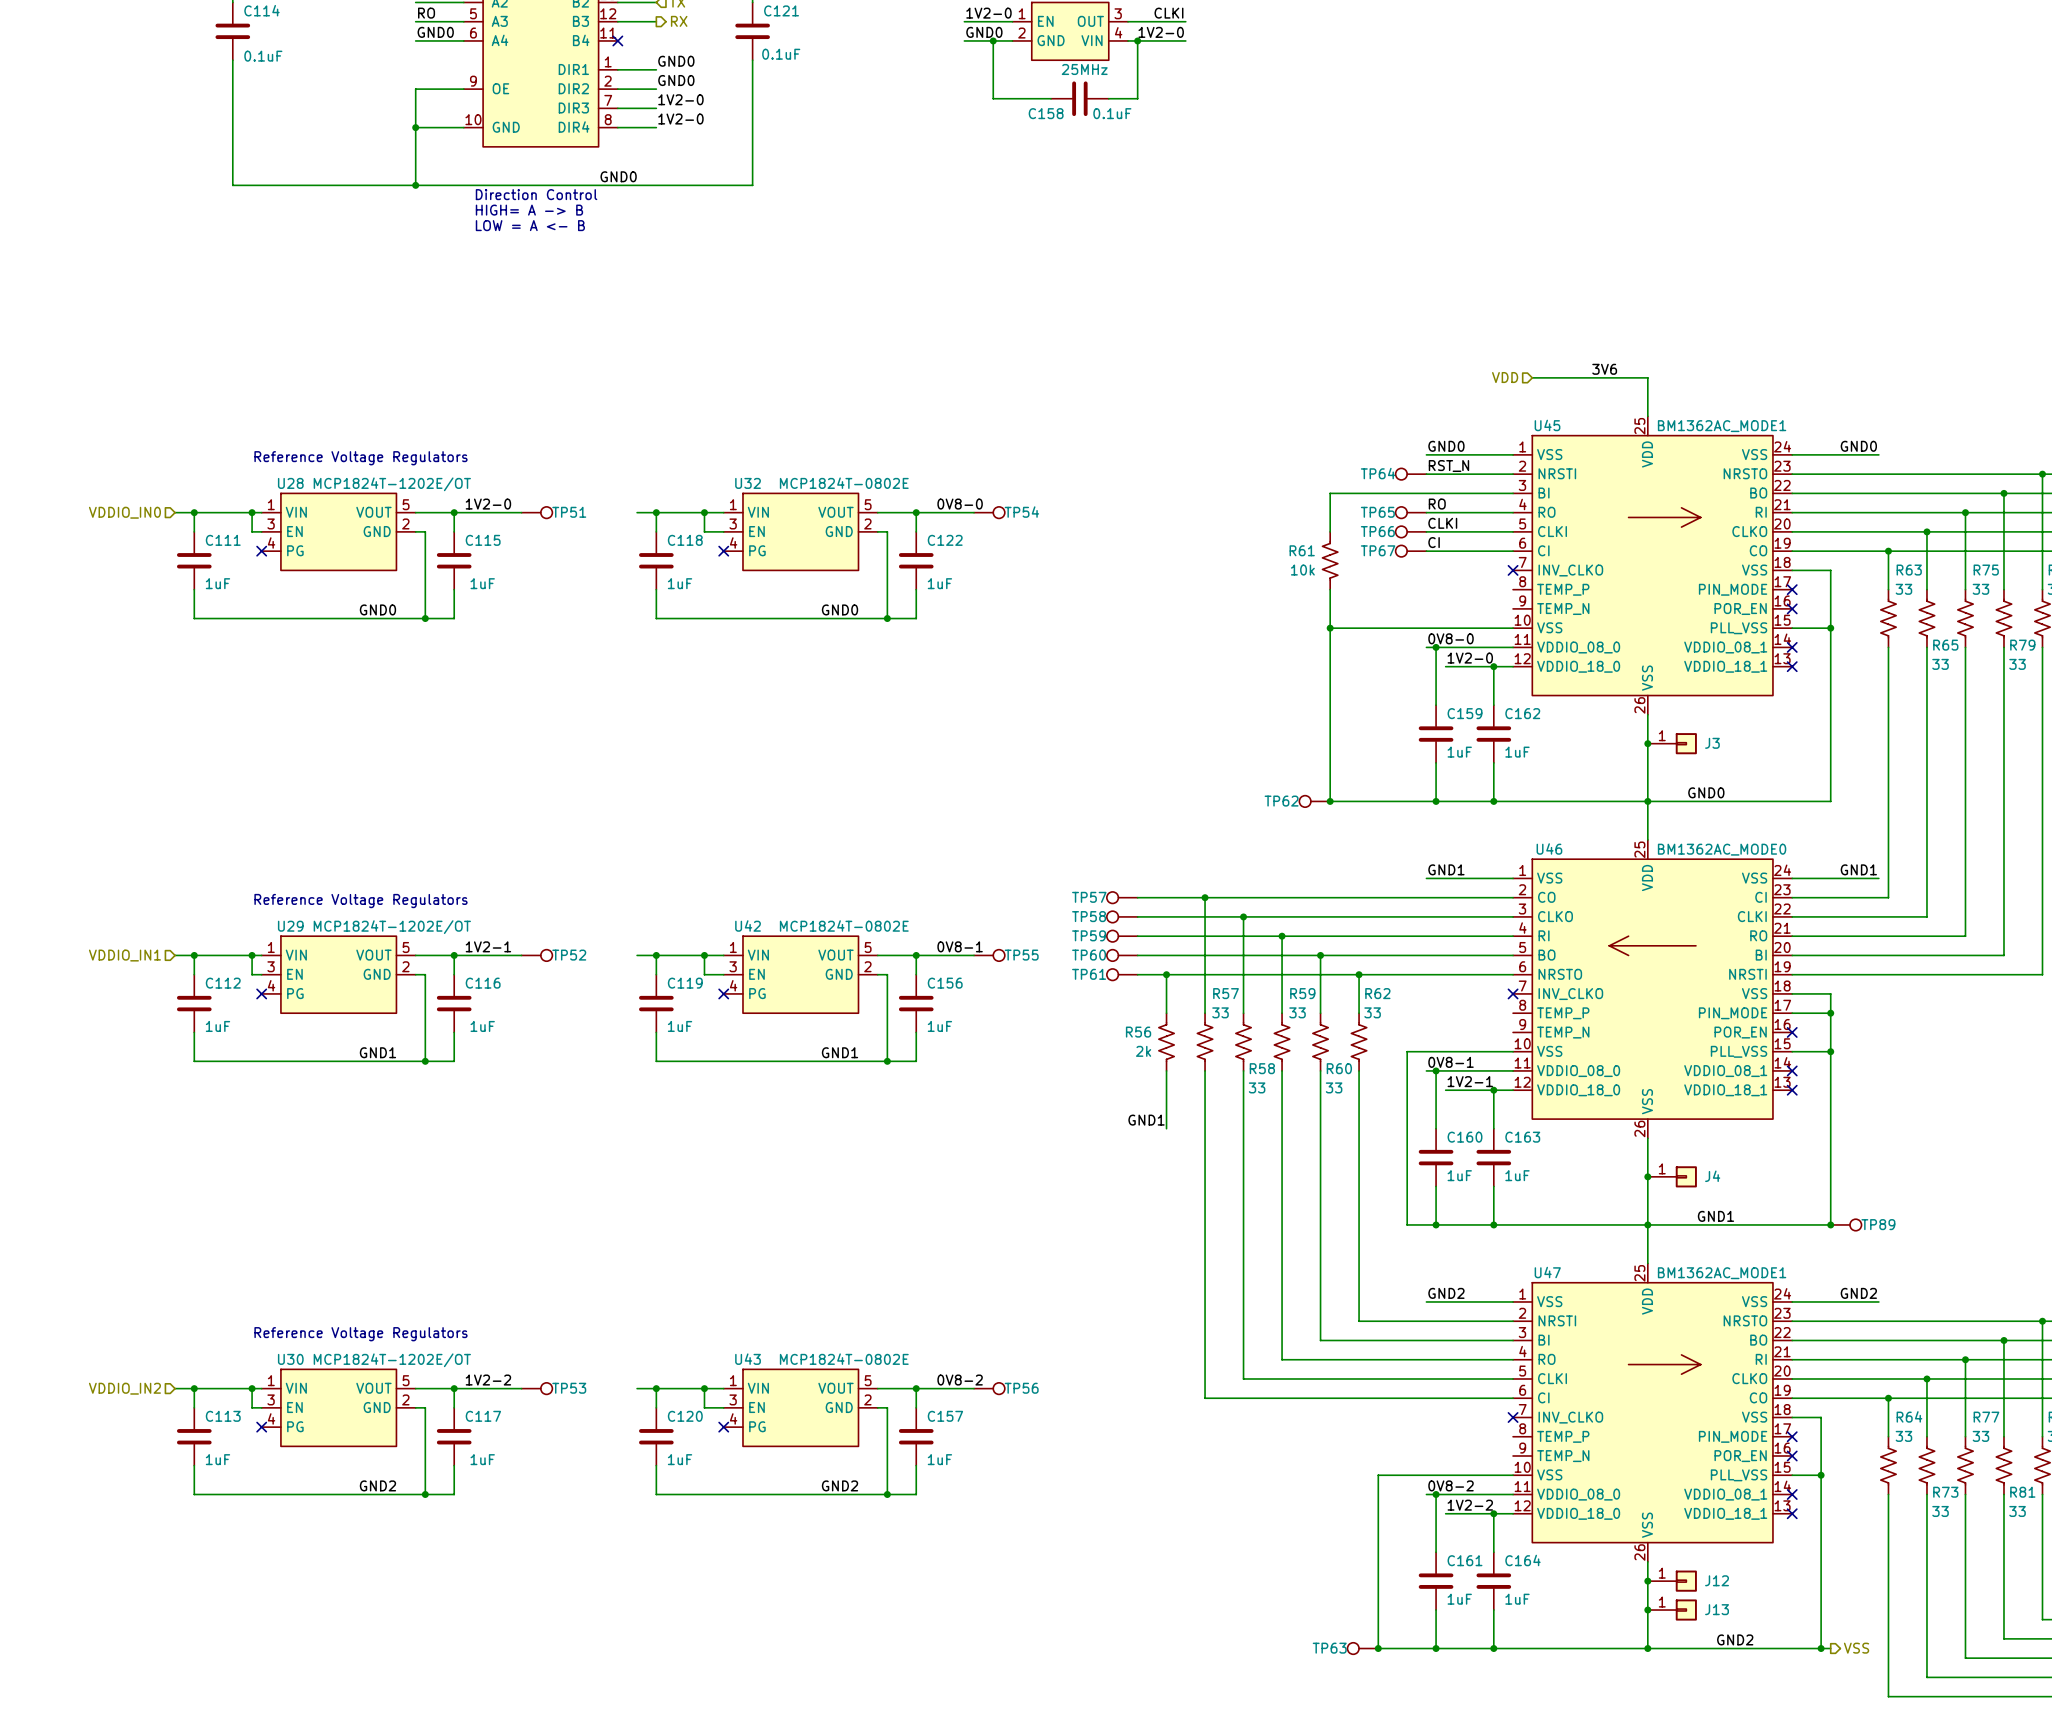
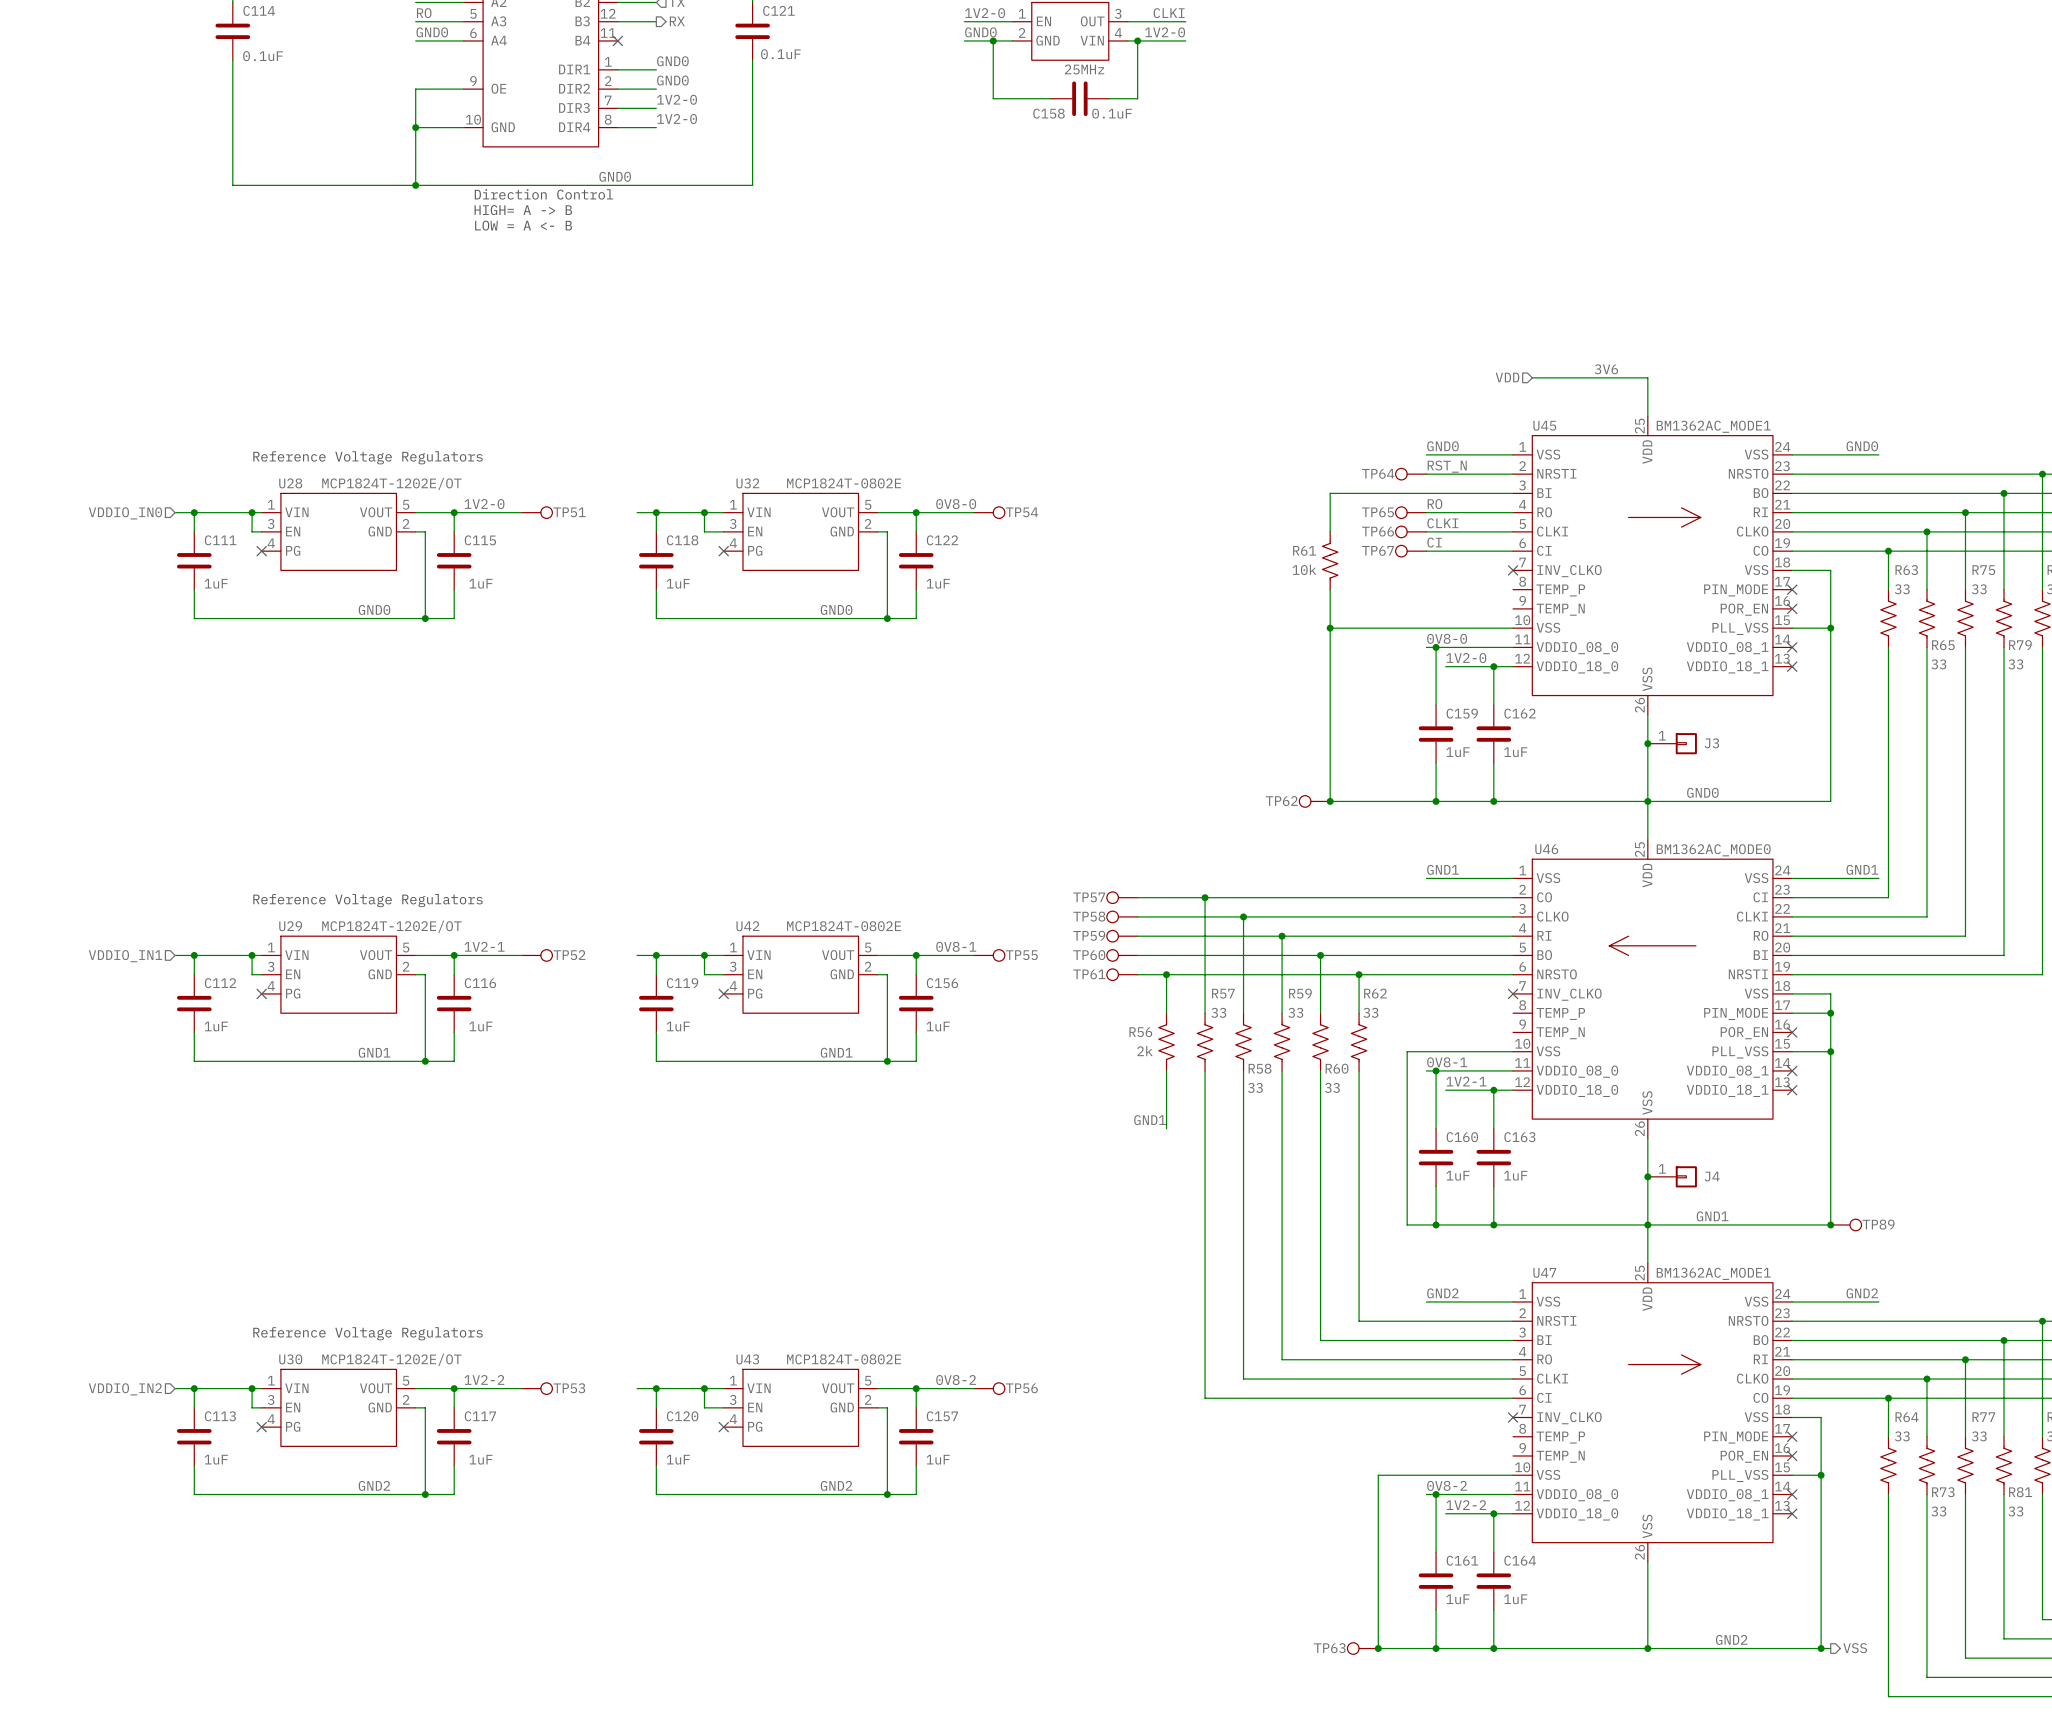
junction: (1647, 1581) -> none
J12: (1672, 1581) -> none
junction: (1647, 1610) -> none
J13: (1672, 1610) -> none

